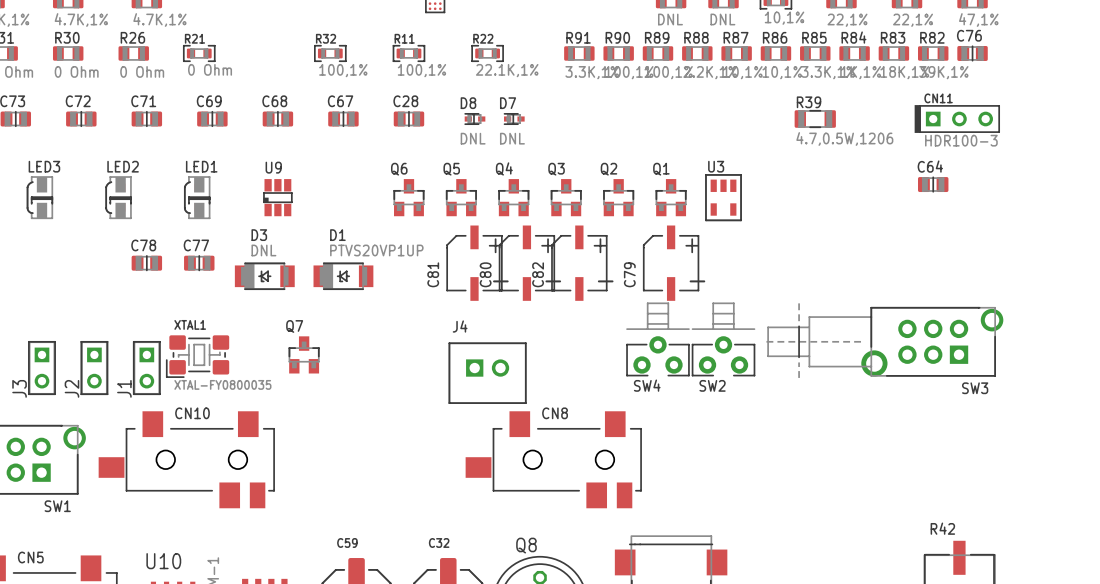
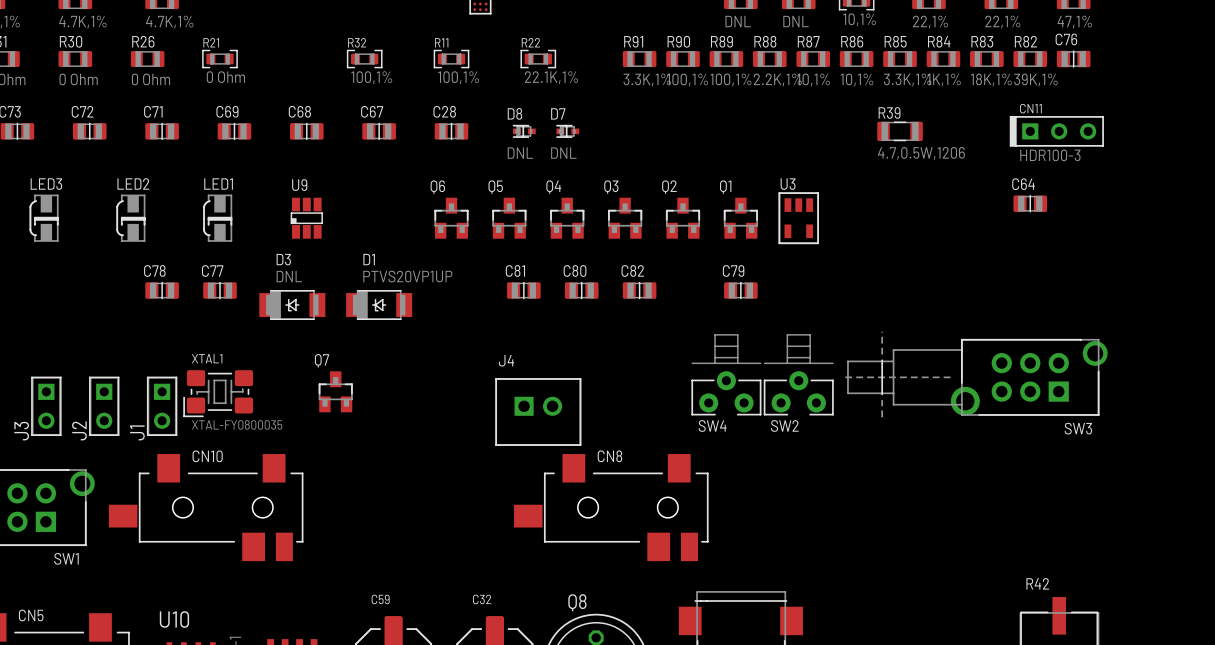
C81 footprint: [446, 225, 503, 301] -> [507, 281, 541, 300]
C80 footprint: [498, 225, 556, 301] -> [564, 281, 599, 300]
C82 footprint: [551, 225, 608, 301] -> [622, 281, 657, 300]
C79 footprint: [642, 225, 700, 301] -> [724, 281, 758, 300]
C81 name position: C81 (433, 274) -> C81 (515, 270)
C80 name position: C80 (485, 274) -> C80 (575, 270)
C82 name position: C82 (538, 274) -> C82 (632, 270)
C79 name position: C79 (629, 274) -> C79 (733, 270)

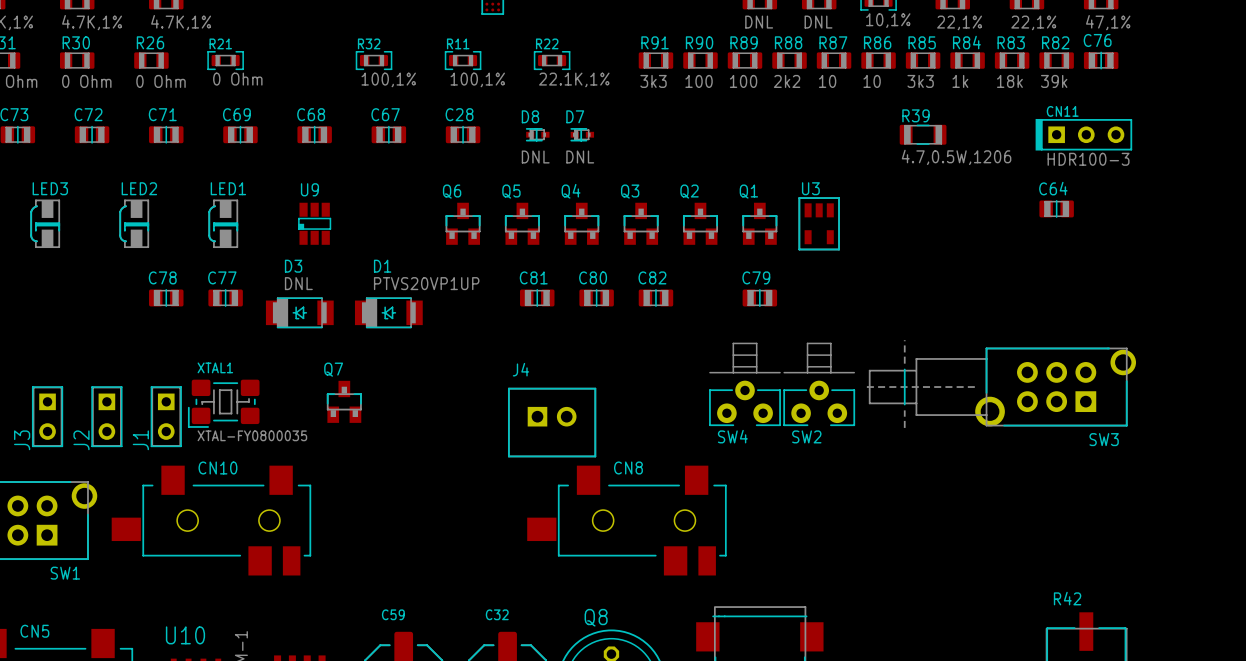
R91 value: 3.3K,1% (647, 79) -> 3k3 (653, 81)
R90 value: 100,1% (687, 79) -> 100 (699, 81)
R89 value: 100,1% (730, 79) -> 100 (743, 81)
R88 value: 2.2K,1% (777, 79) -> 2k2 (787, 81)
R87 value: 10,1% (813, 79) -> 10 (827, 81)
R86 value: 10,1% (856, 79) -> 10 (872, 81)
R85 value: 3.3K,1% (907, 79) -> 3k3 (920, 81)
R84 value: 1K,1% (944, 79) -> 1k (960, 81)
R83 value: 18K,1% (991, 79) -> 18k (1009, 81)
R82 value: 39K,1% (1035, 79) -> 39k (1054, 81)

